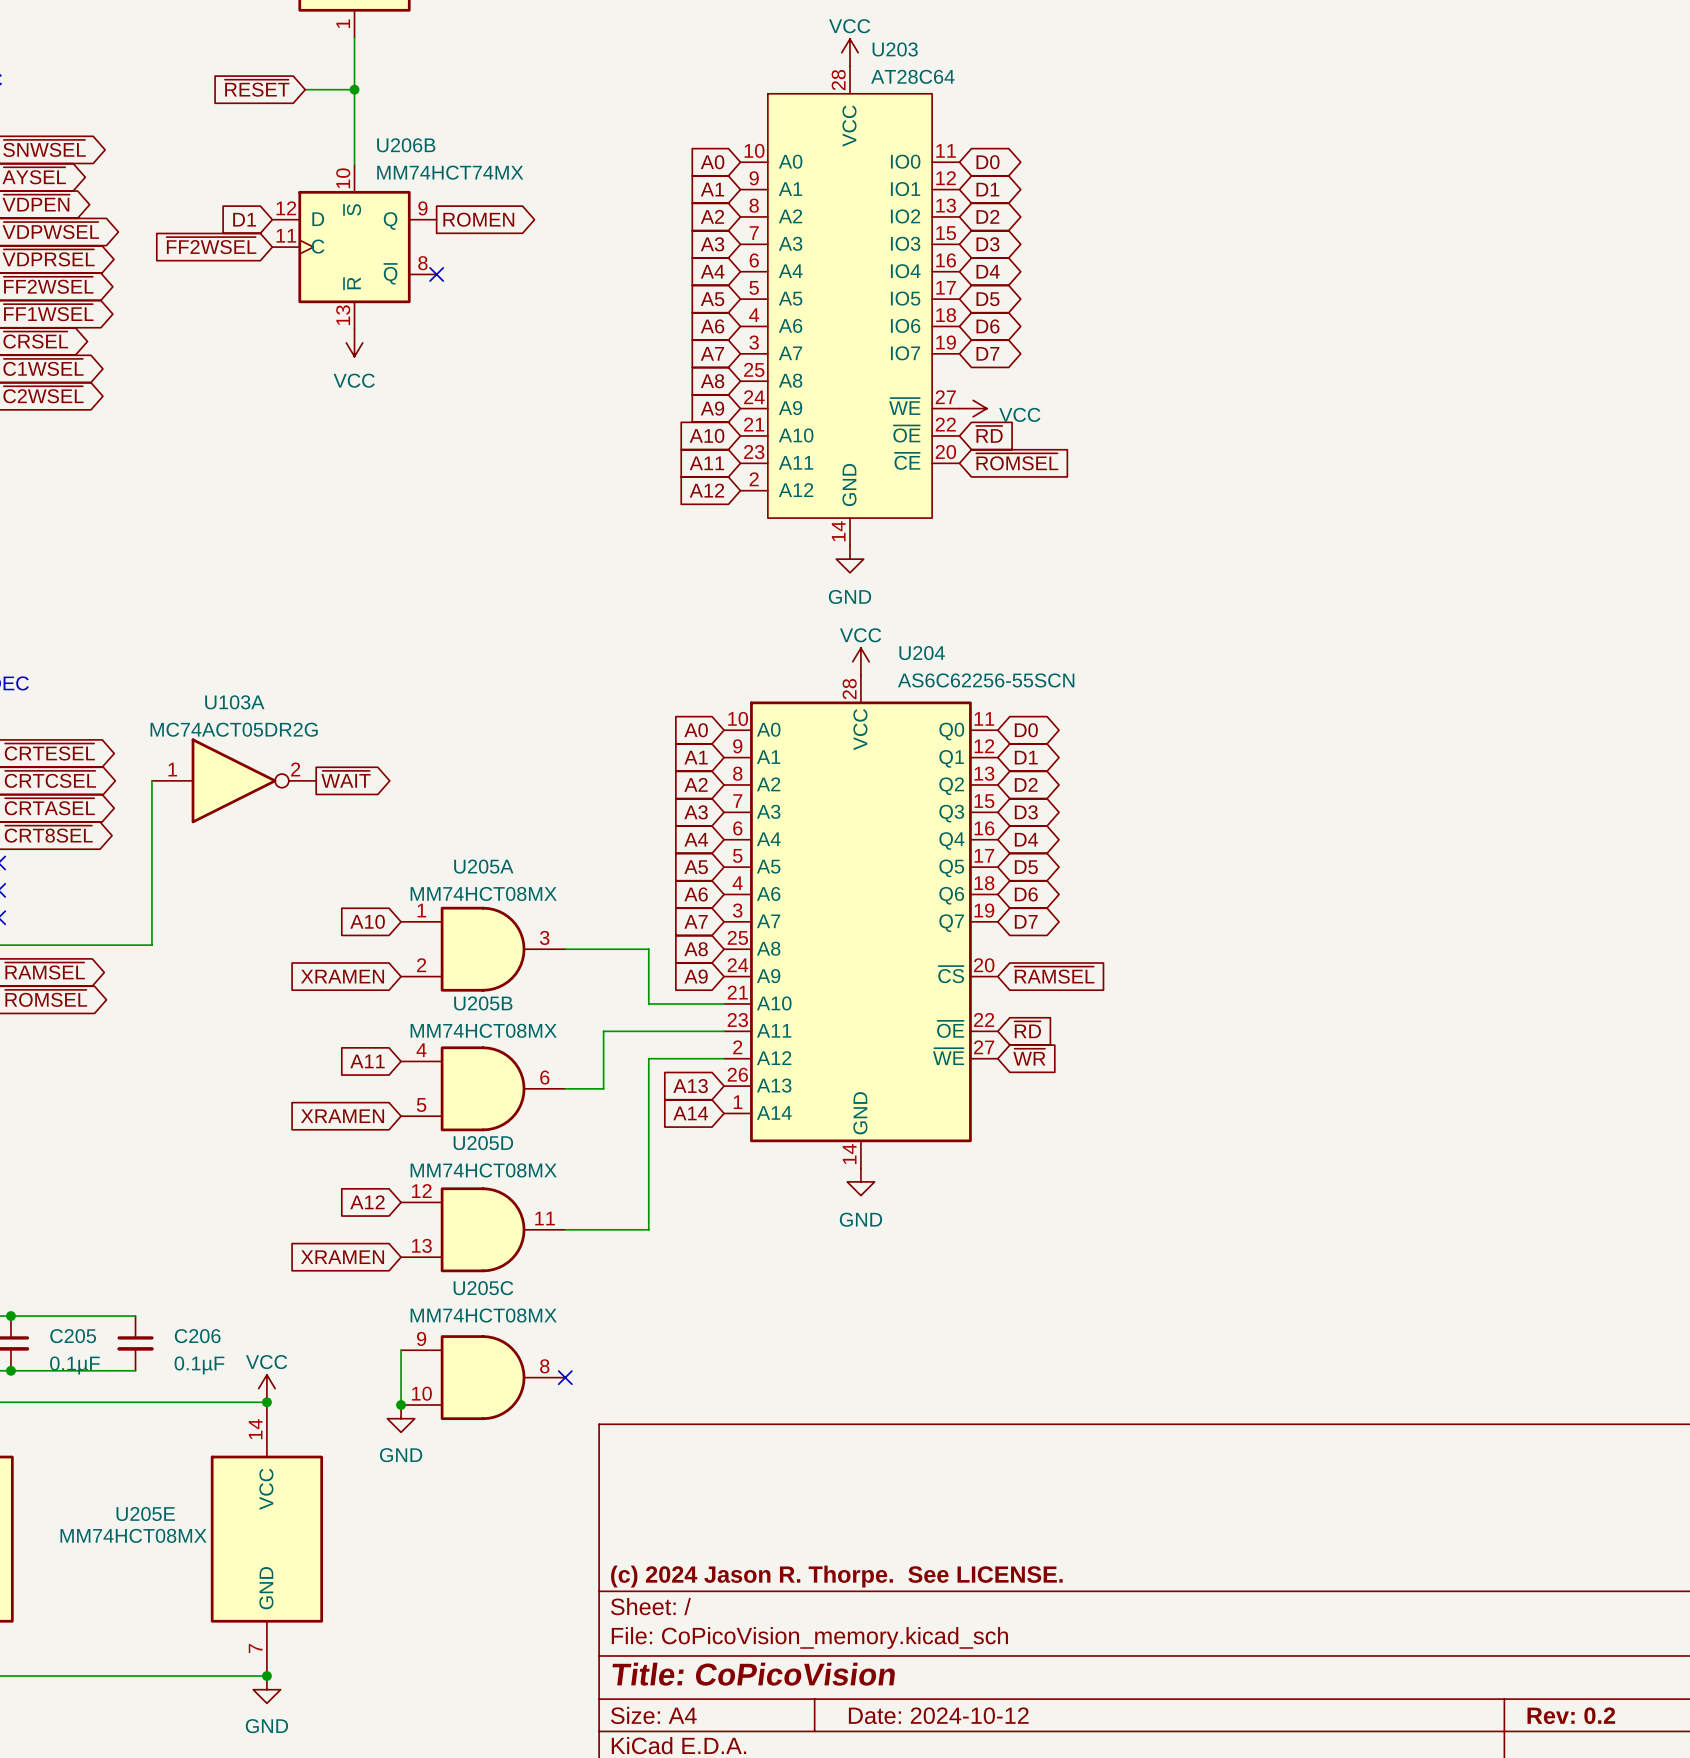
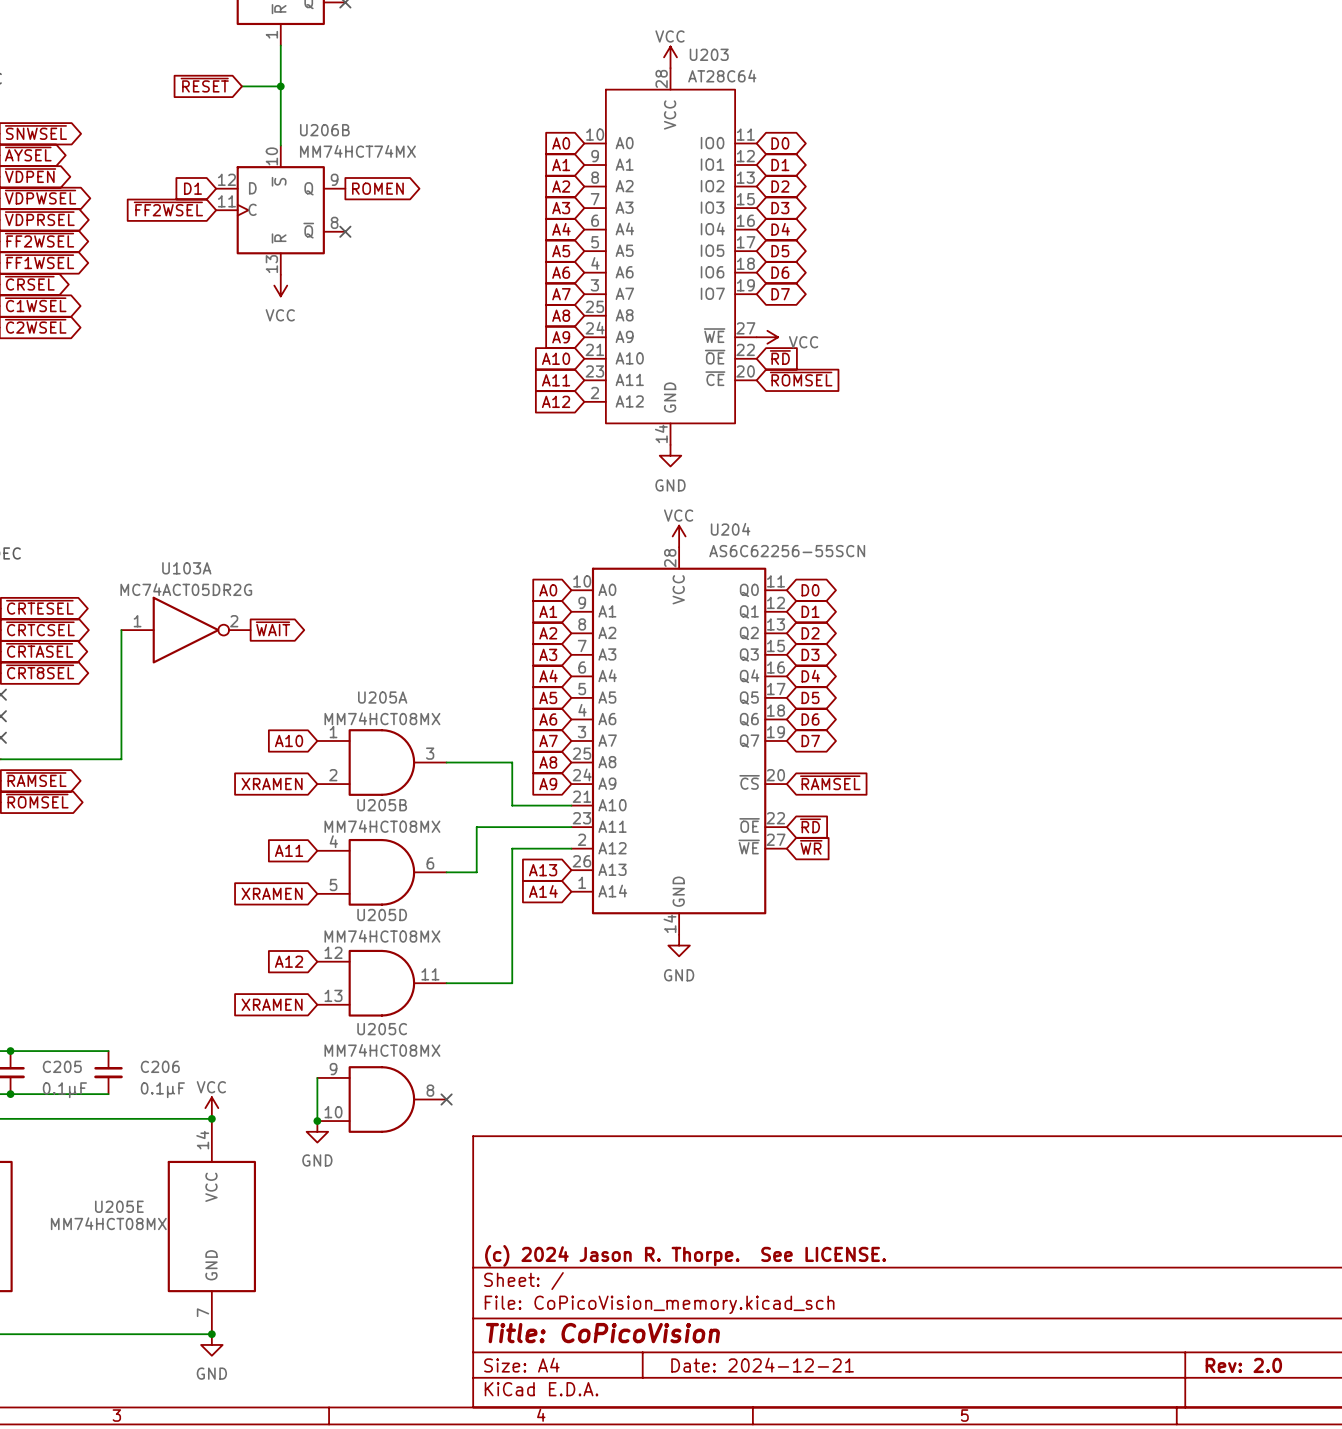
title block: Date: 2024-10-12 (938, 1715) -> Date: 2024-12-21 (762, 1365)
title block: Rev: 0.2 (1571, 1715) -> Rev: 2.0 (1243, 1365)

